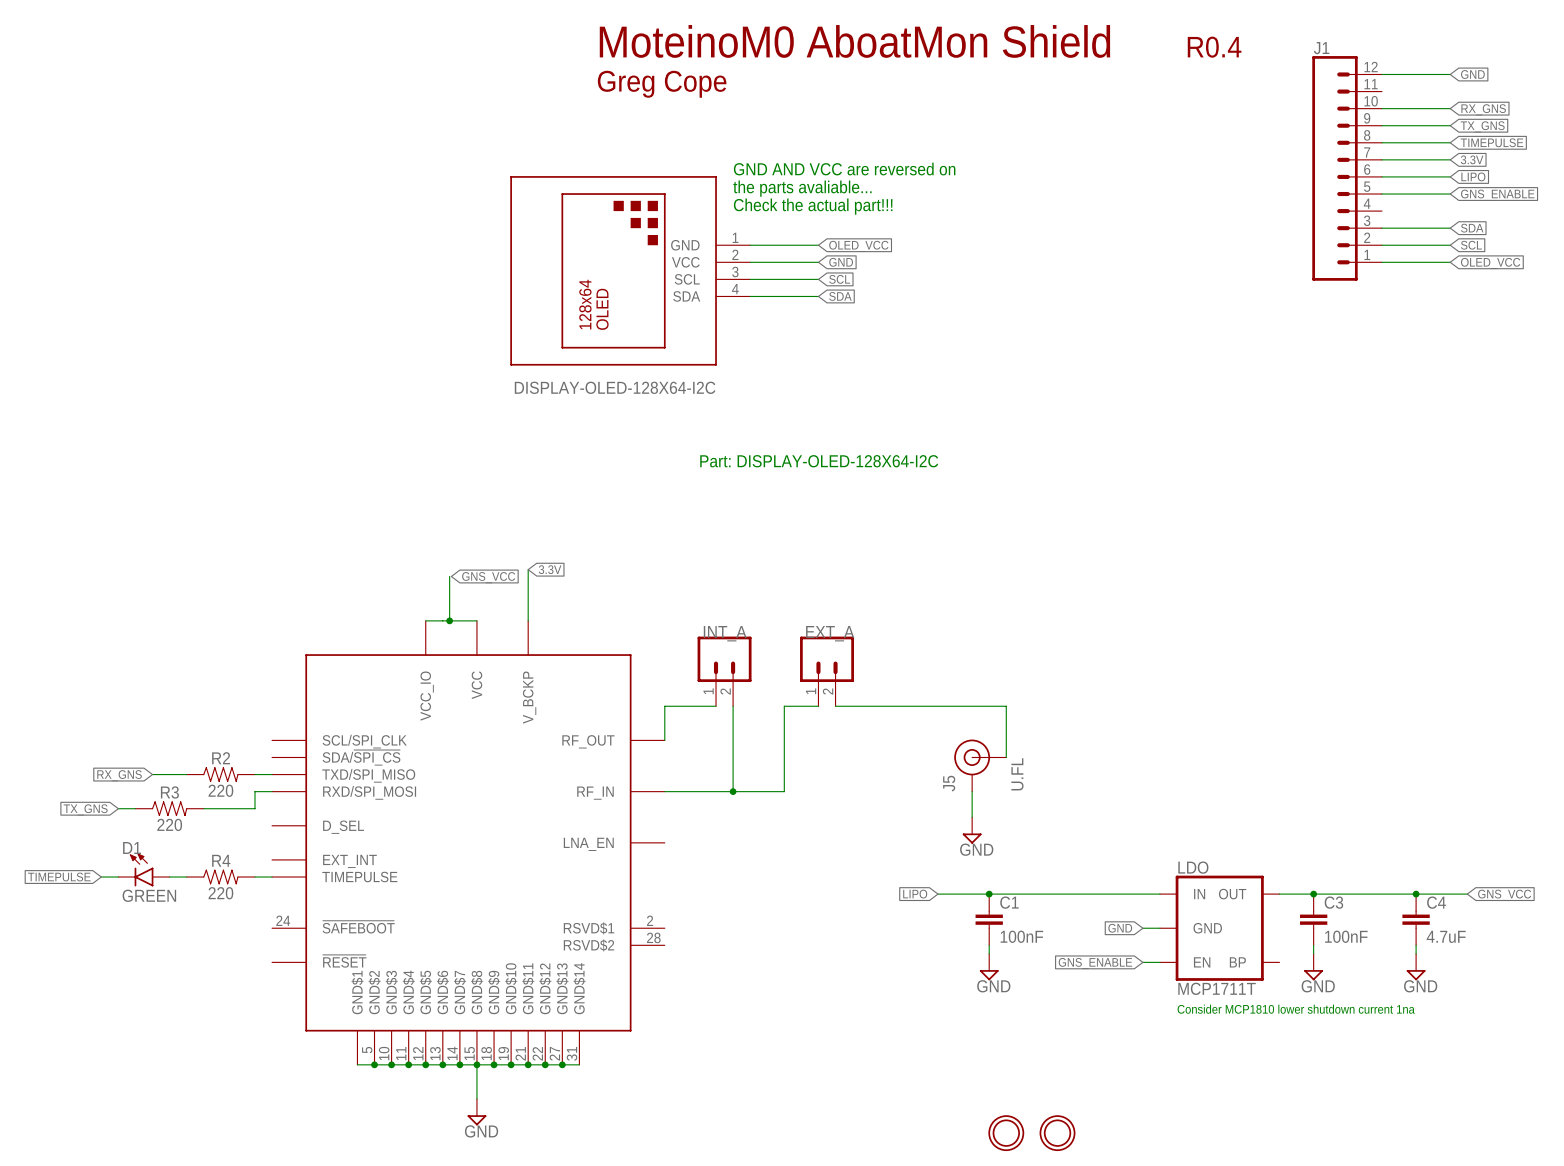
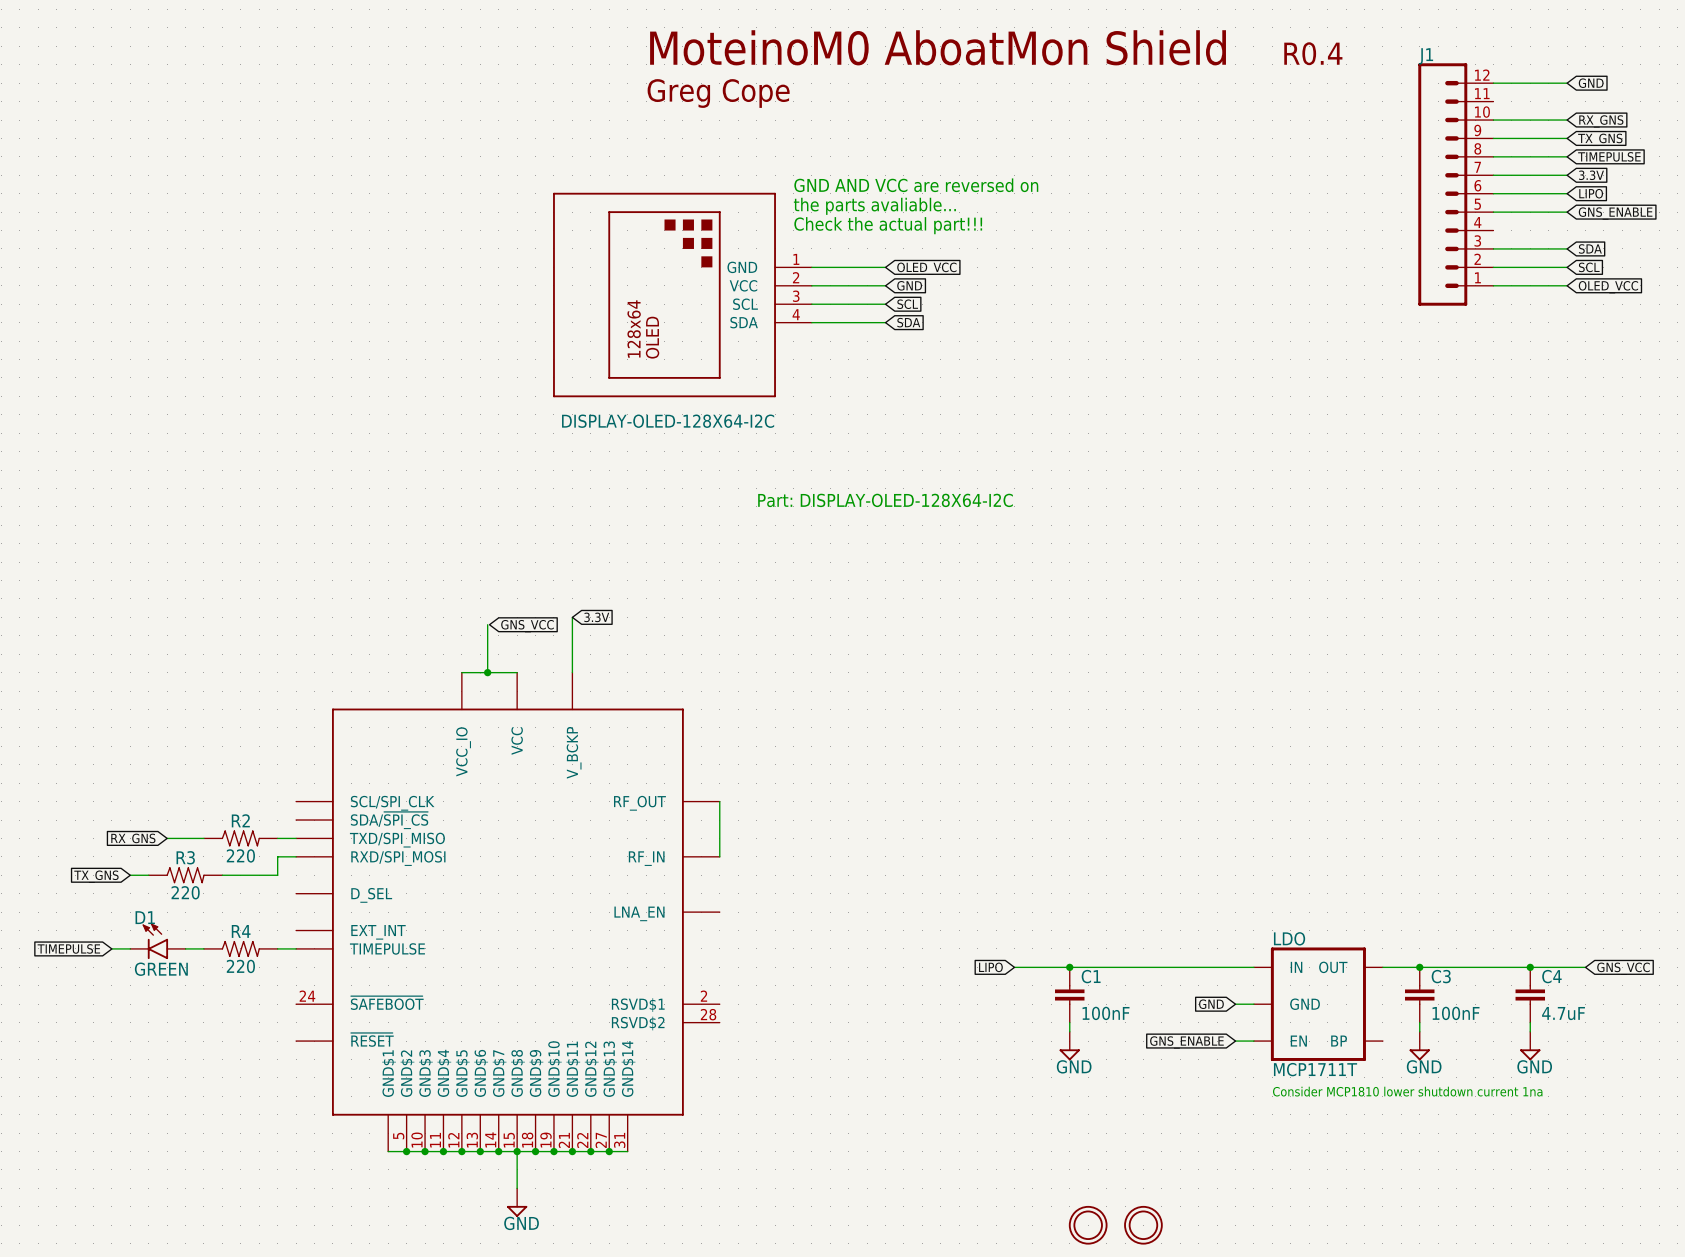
INT_A: (724, 671) -> none
EXT_A: (827, 671) -> none
wire: (716, 706) (664, 706) (664, 740) -> (719, 856) (719, 801)
wire: (733, 706) (733, 791) -> none
wire: (818, 706) (784, 706) (784, 791) (664, 791) -> none
wire: (835, 706) (1006, 706) (1006, 757) -> none
J5: U.FL (980, 765) -> none
junction: (733, 791) -> none
wire: (972, 791) (972, 817) -> none
power symbol: GND (972, 830) -> none

